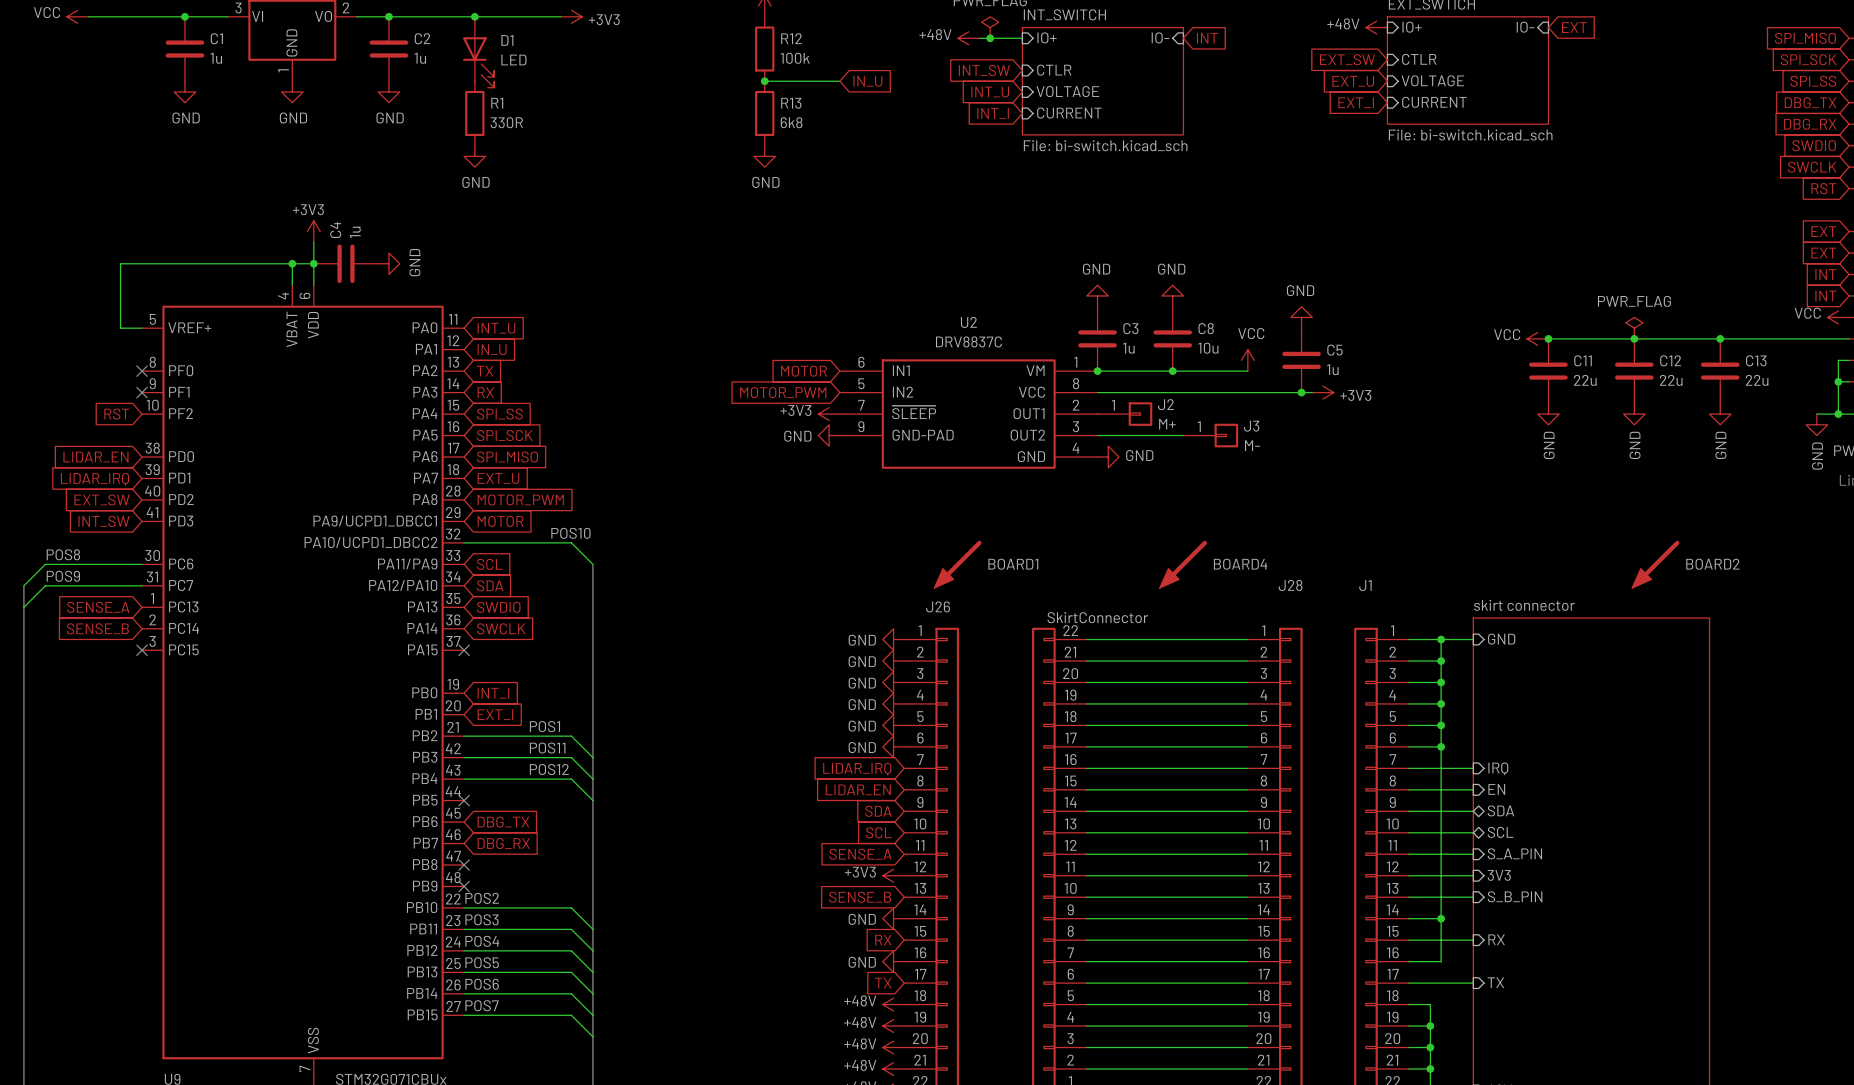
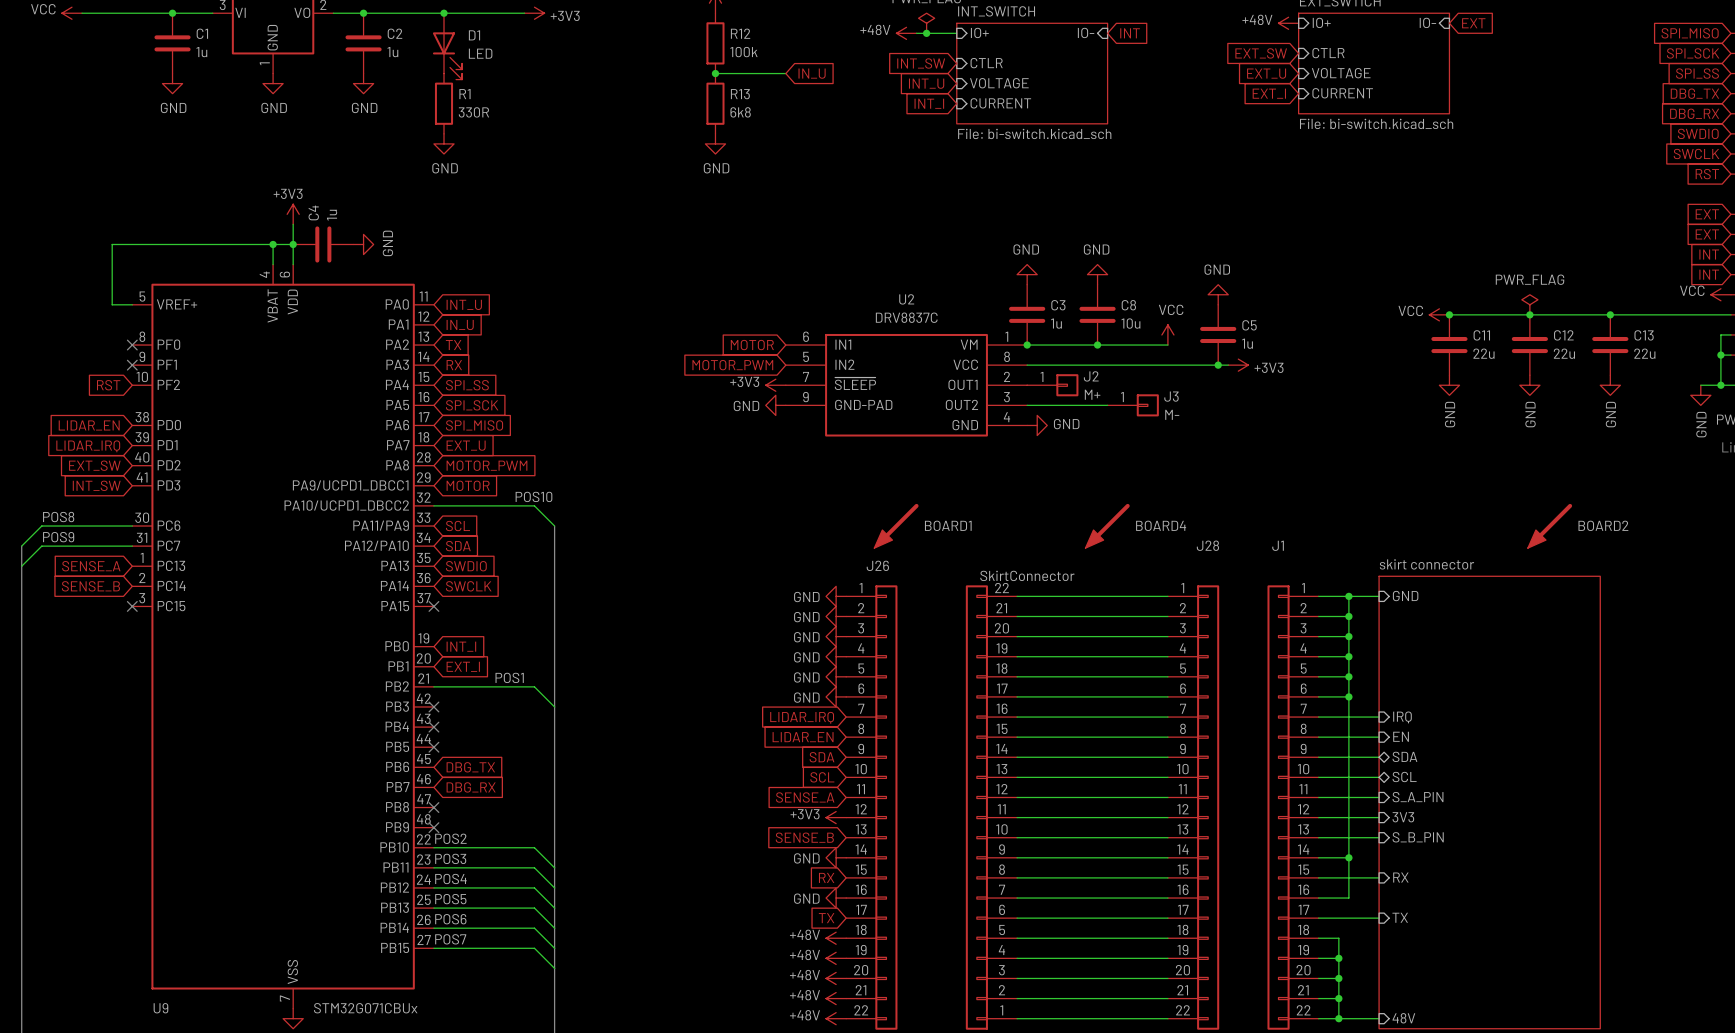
label: POS11 (547, 748) -> none
wire: (464, 757) (571, 757) (592, 779) -> none
no-connect mark: none -> (433, 706)
label: POS12 (549, 769) -> none
wire: (464, 779) (571, 779) (592, 800) -> none
no-connect mark: none -> (433, 727)

